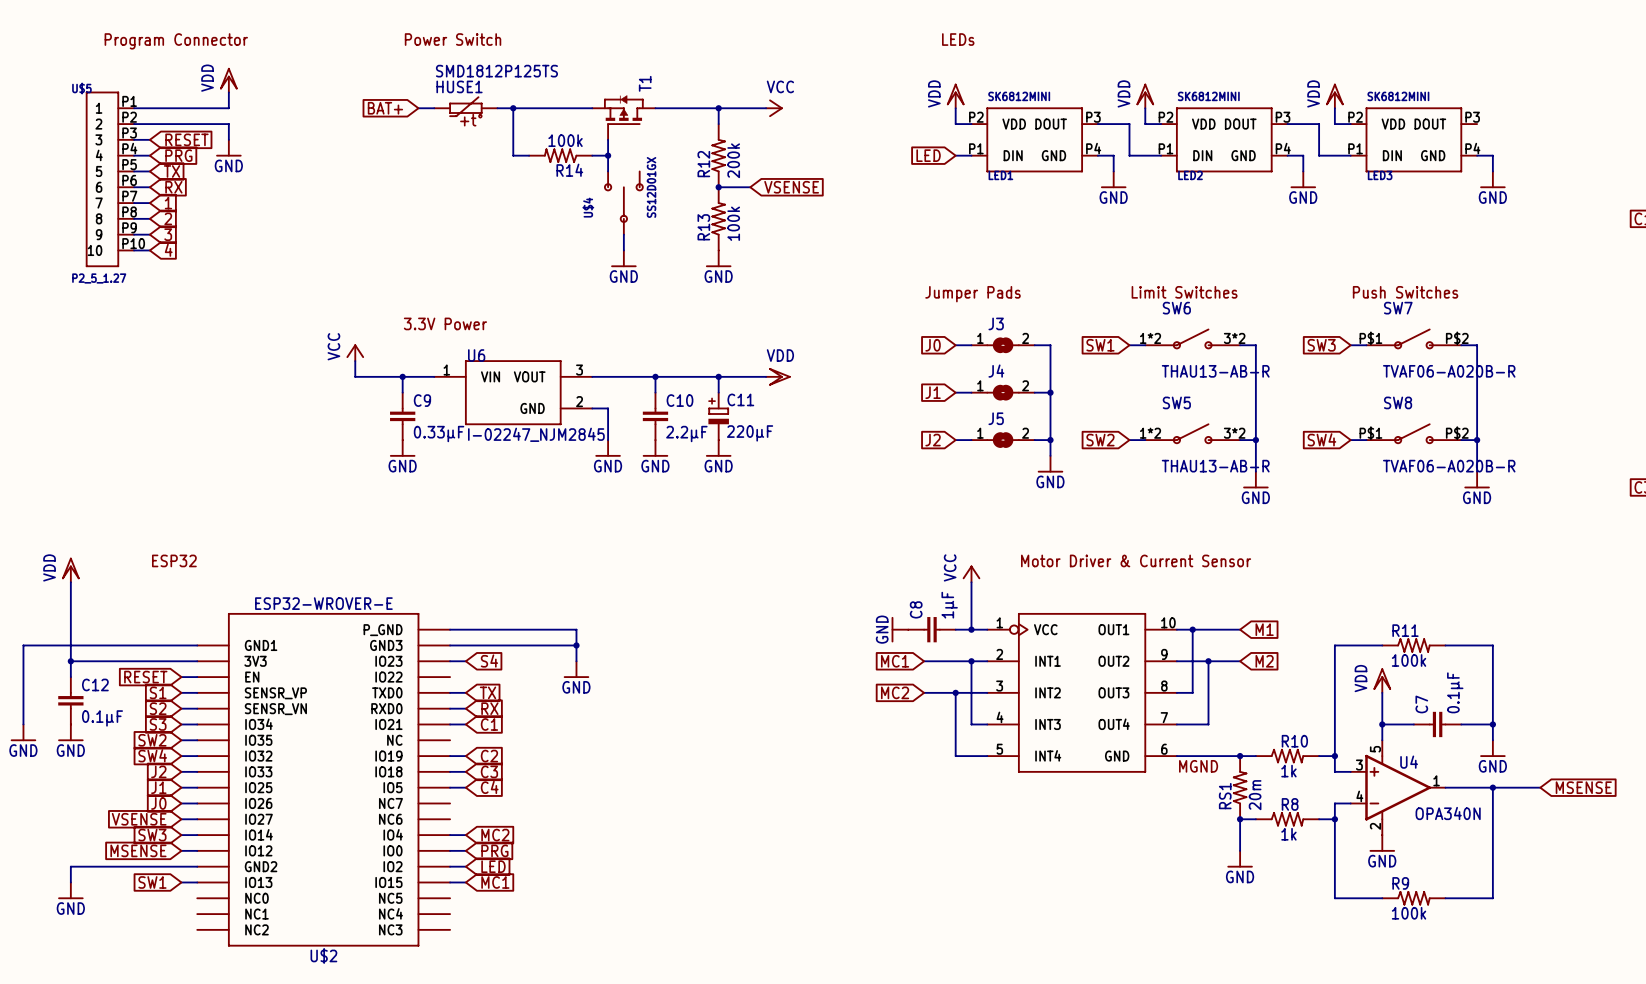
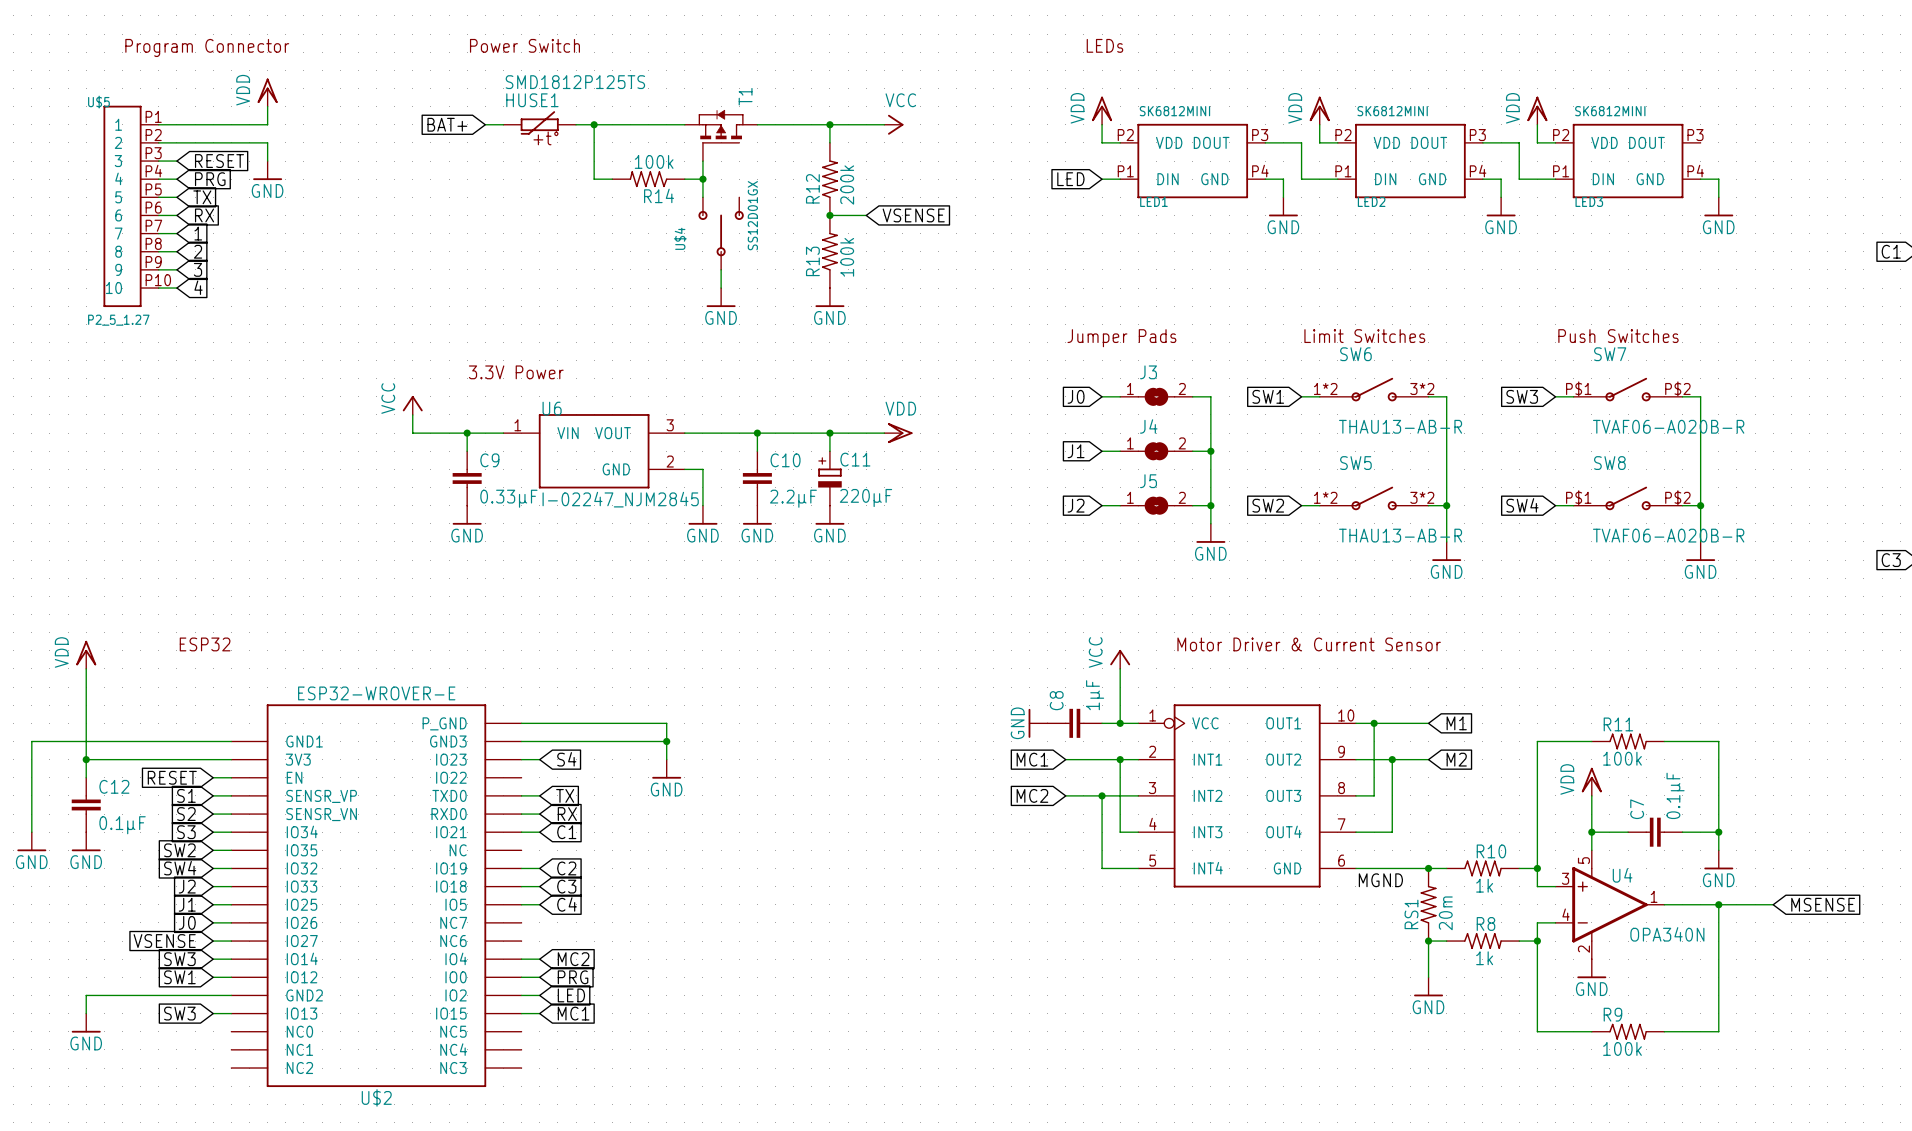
global label: MSENSE (138, 850) -> SW1 (179, 977)
global label: SW1 (152, 882) -> SW3 (179, 1013)

